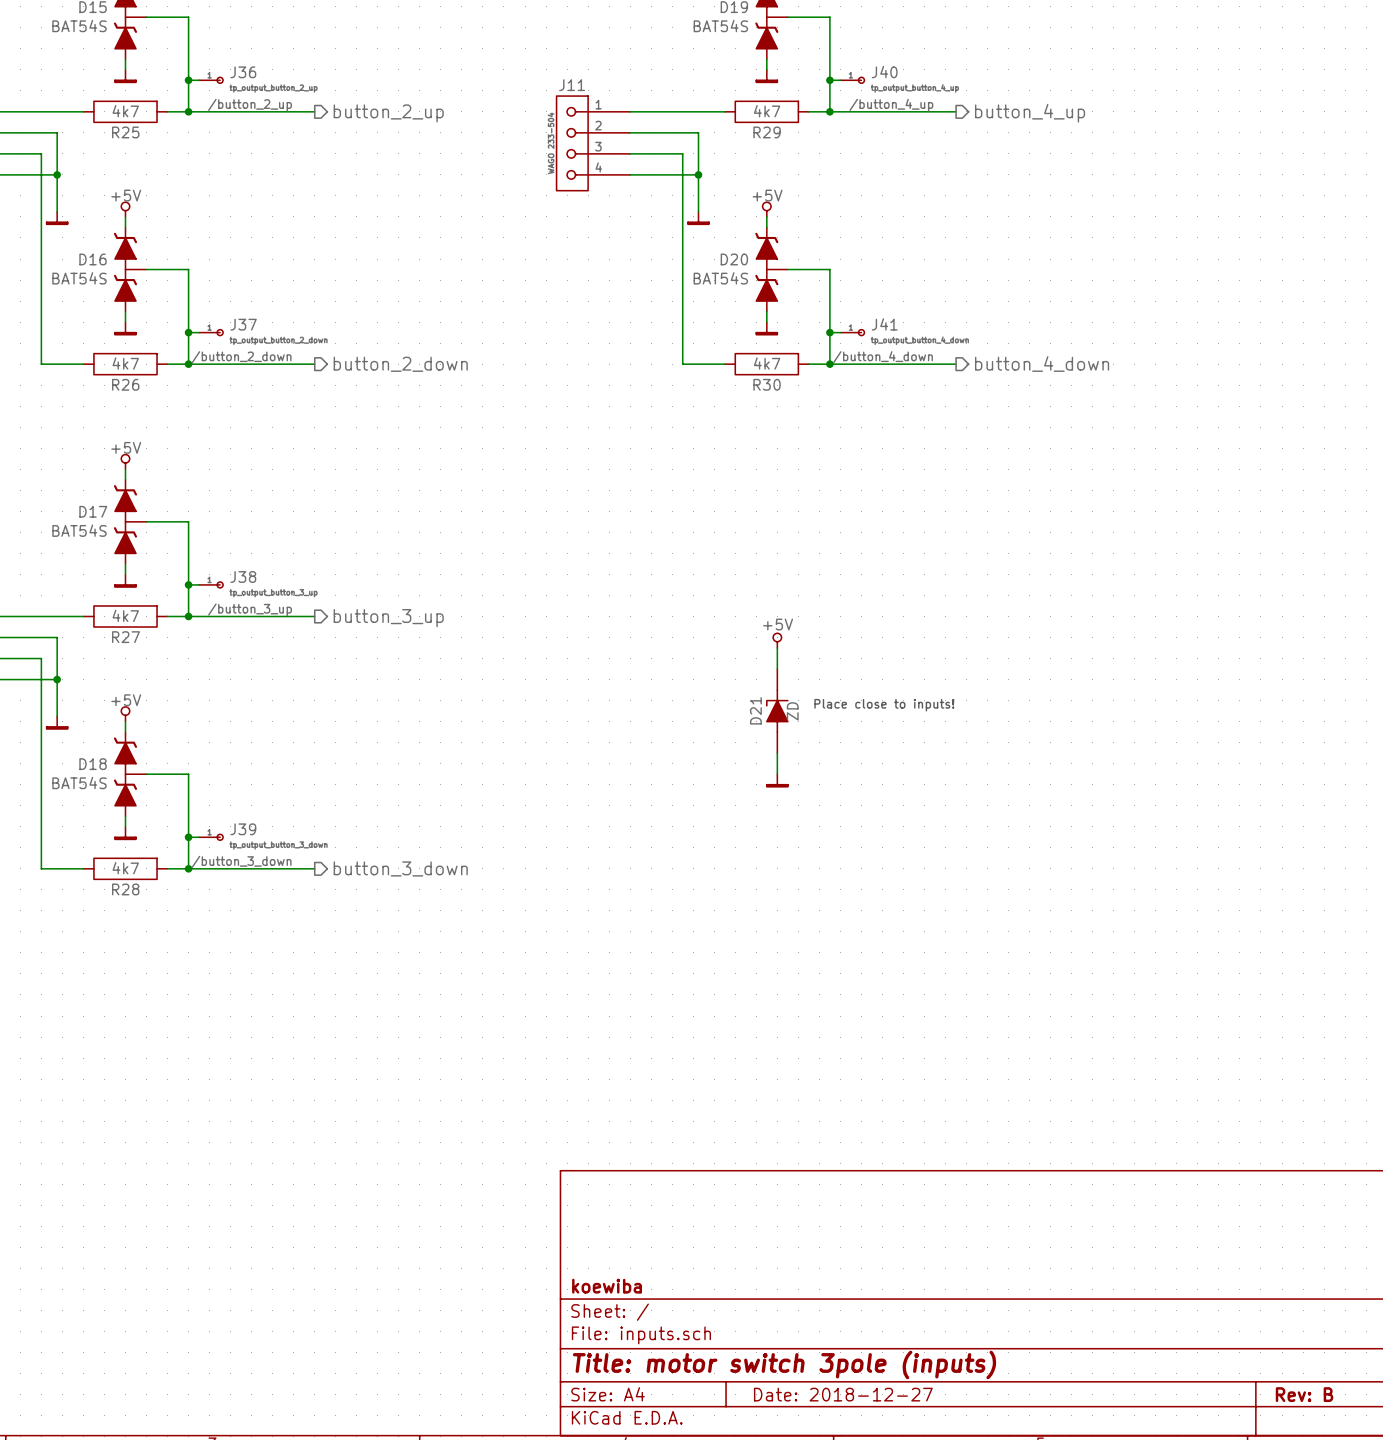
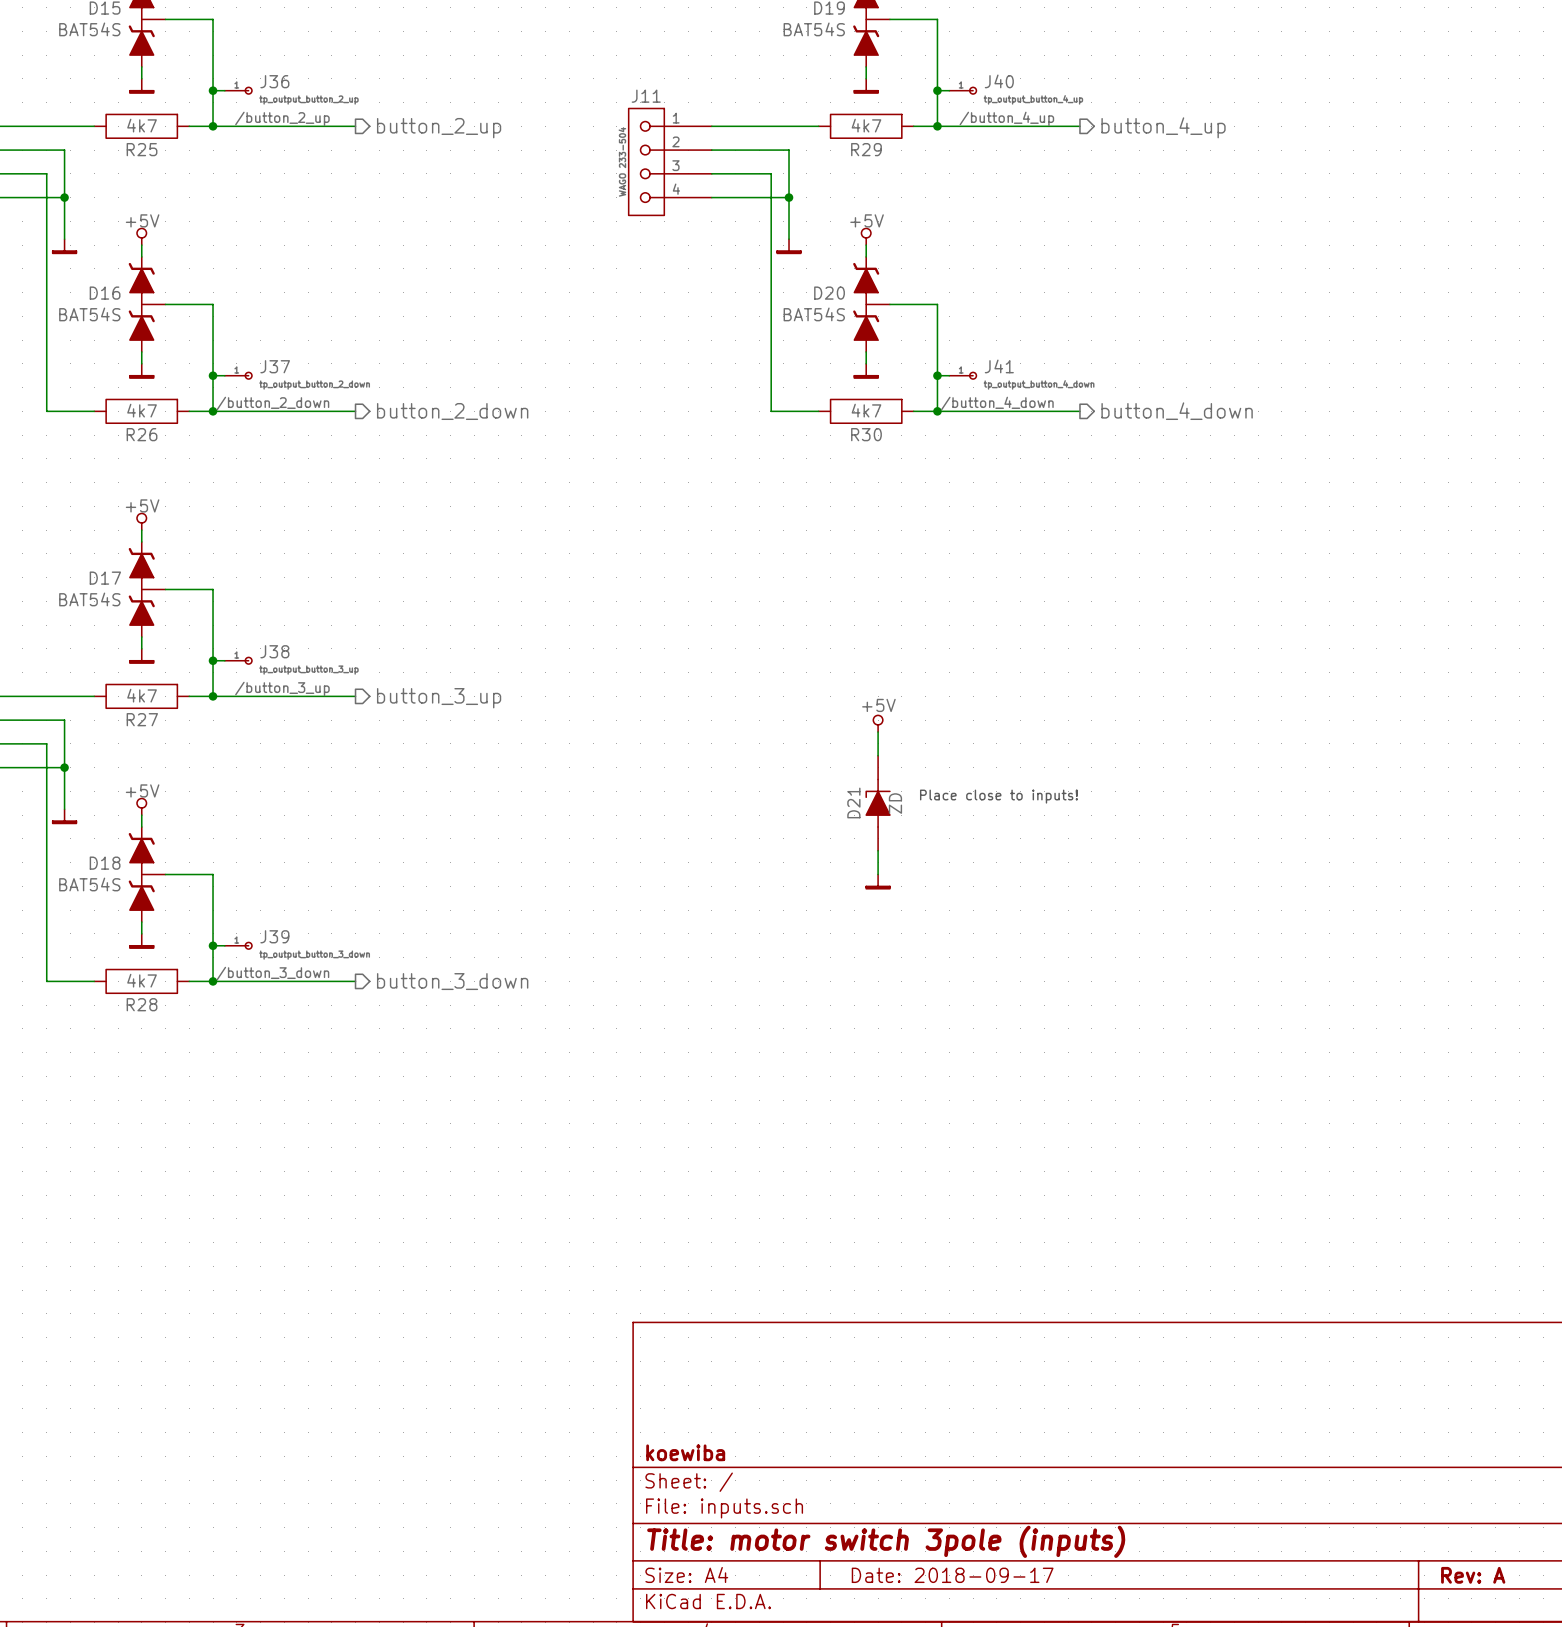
title block: Date: 2018-12-27 (843, 1394) -> Date: 2018-09-17 (952, 1575)
title block: Rev: B (1304, 1394) -> Rev: A (1473, 1575)

